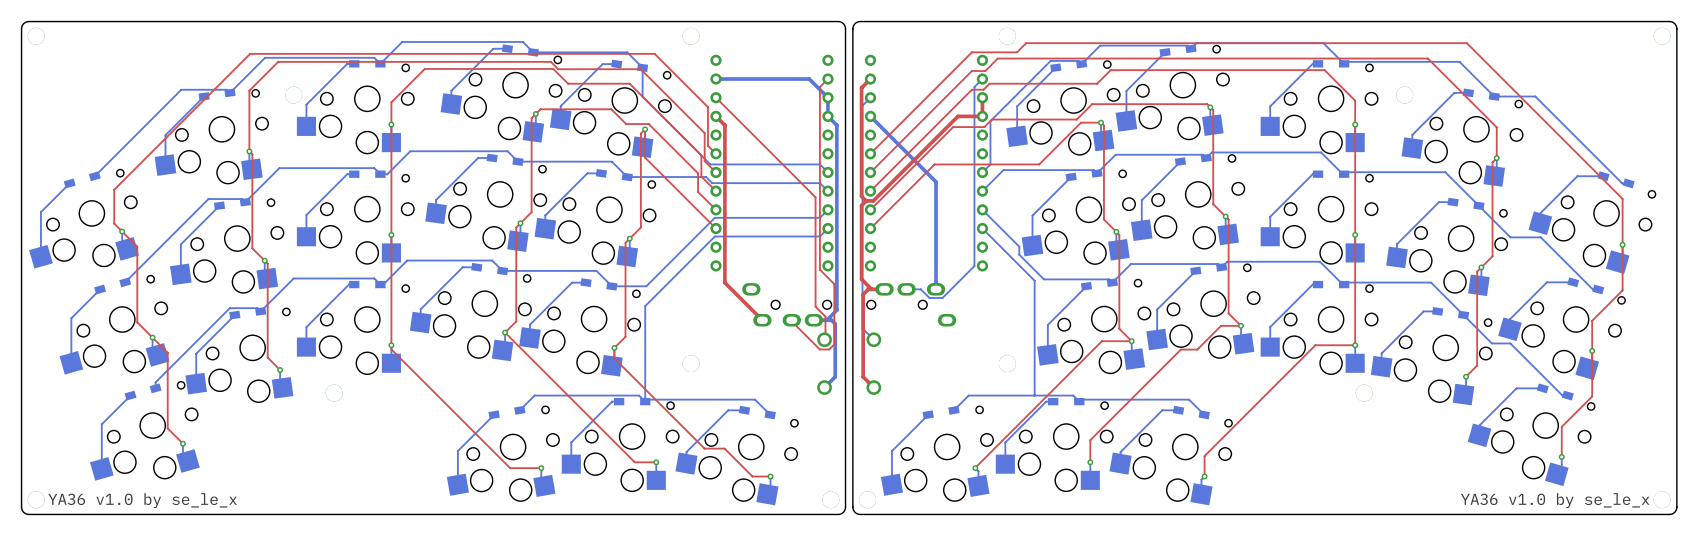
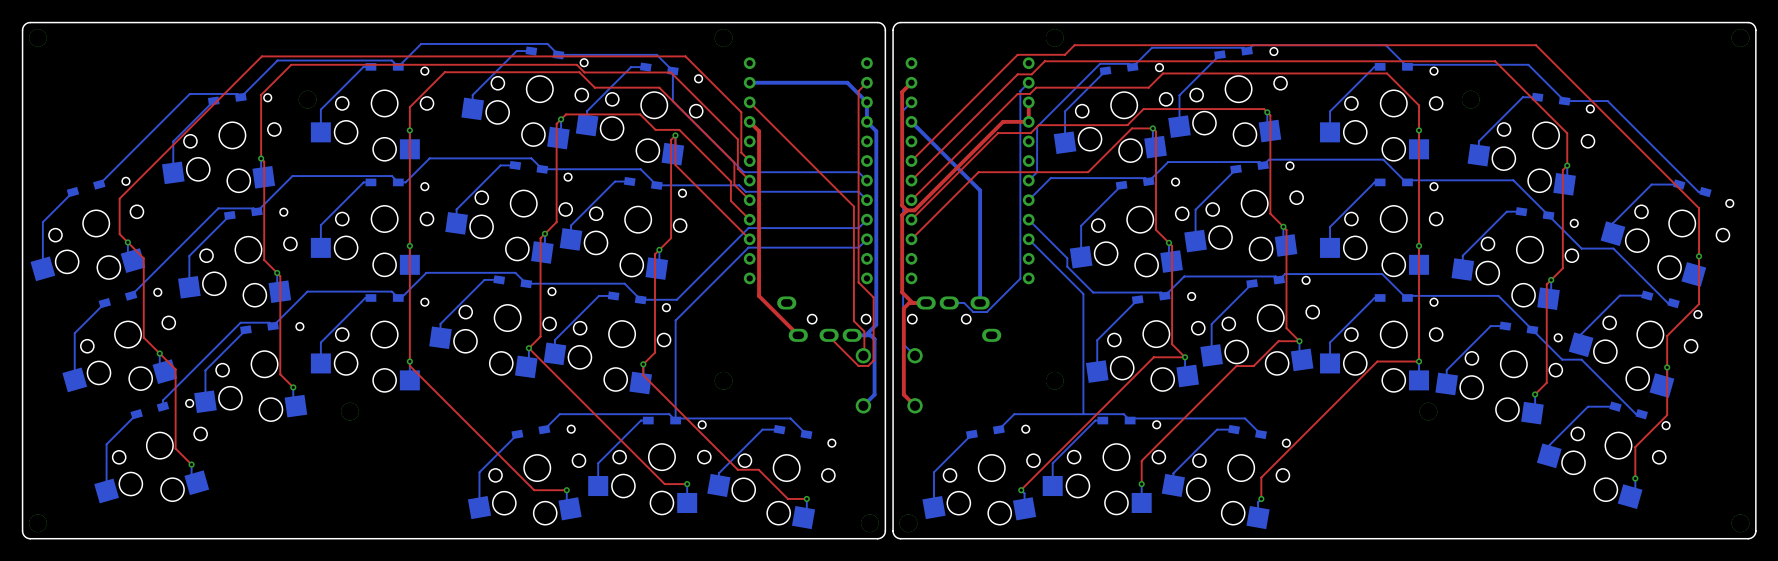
text: YA36 v1.0 by se_le_x (142, 500) -> none
text: YA36 v1.0 by se_le_x (1555, 500) -> none

